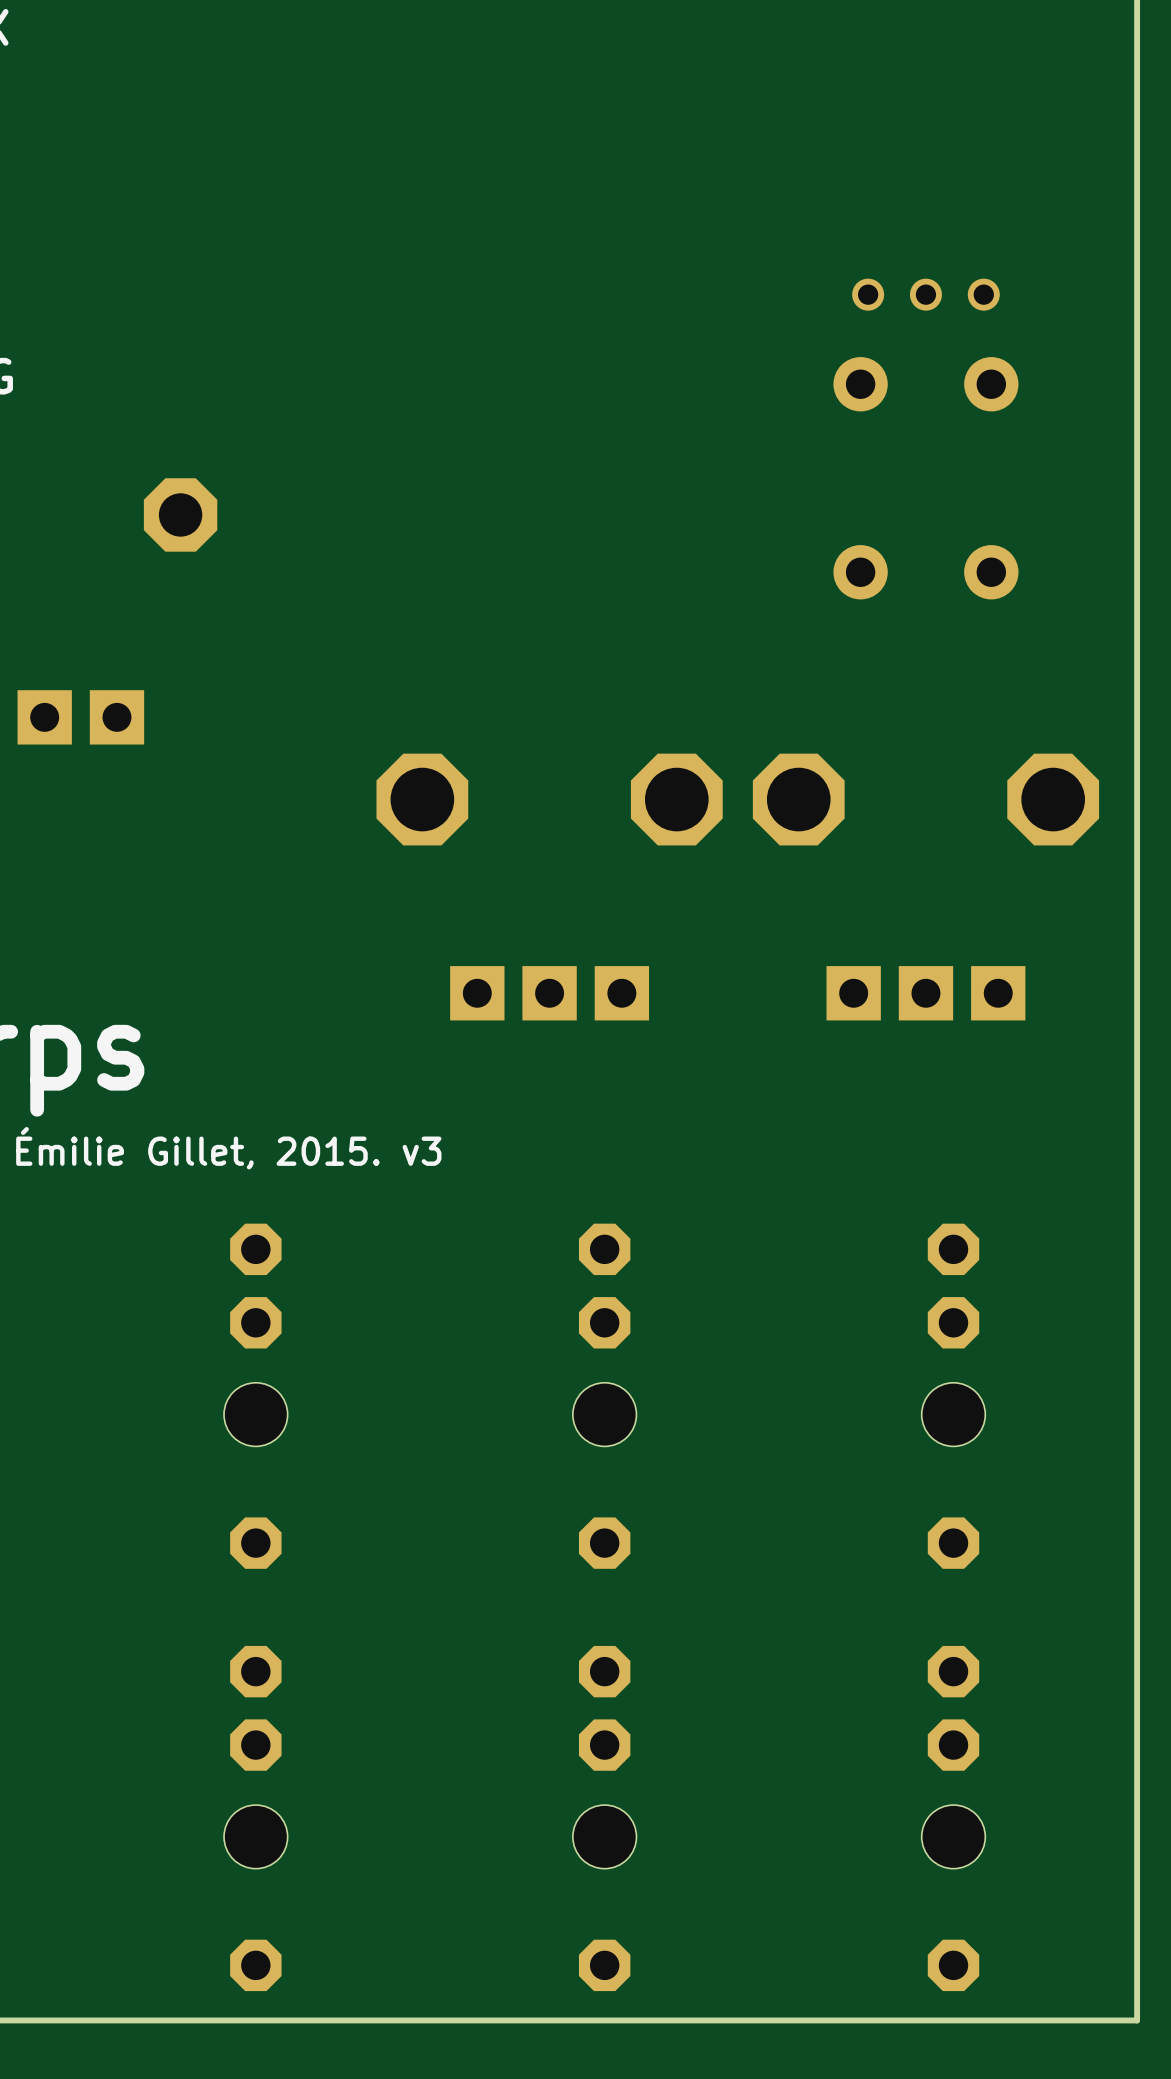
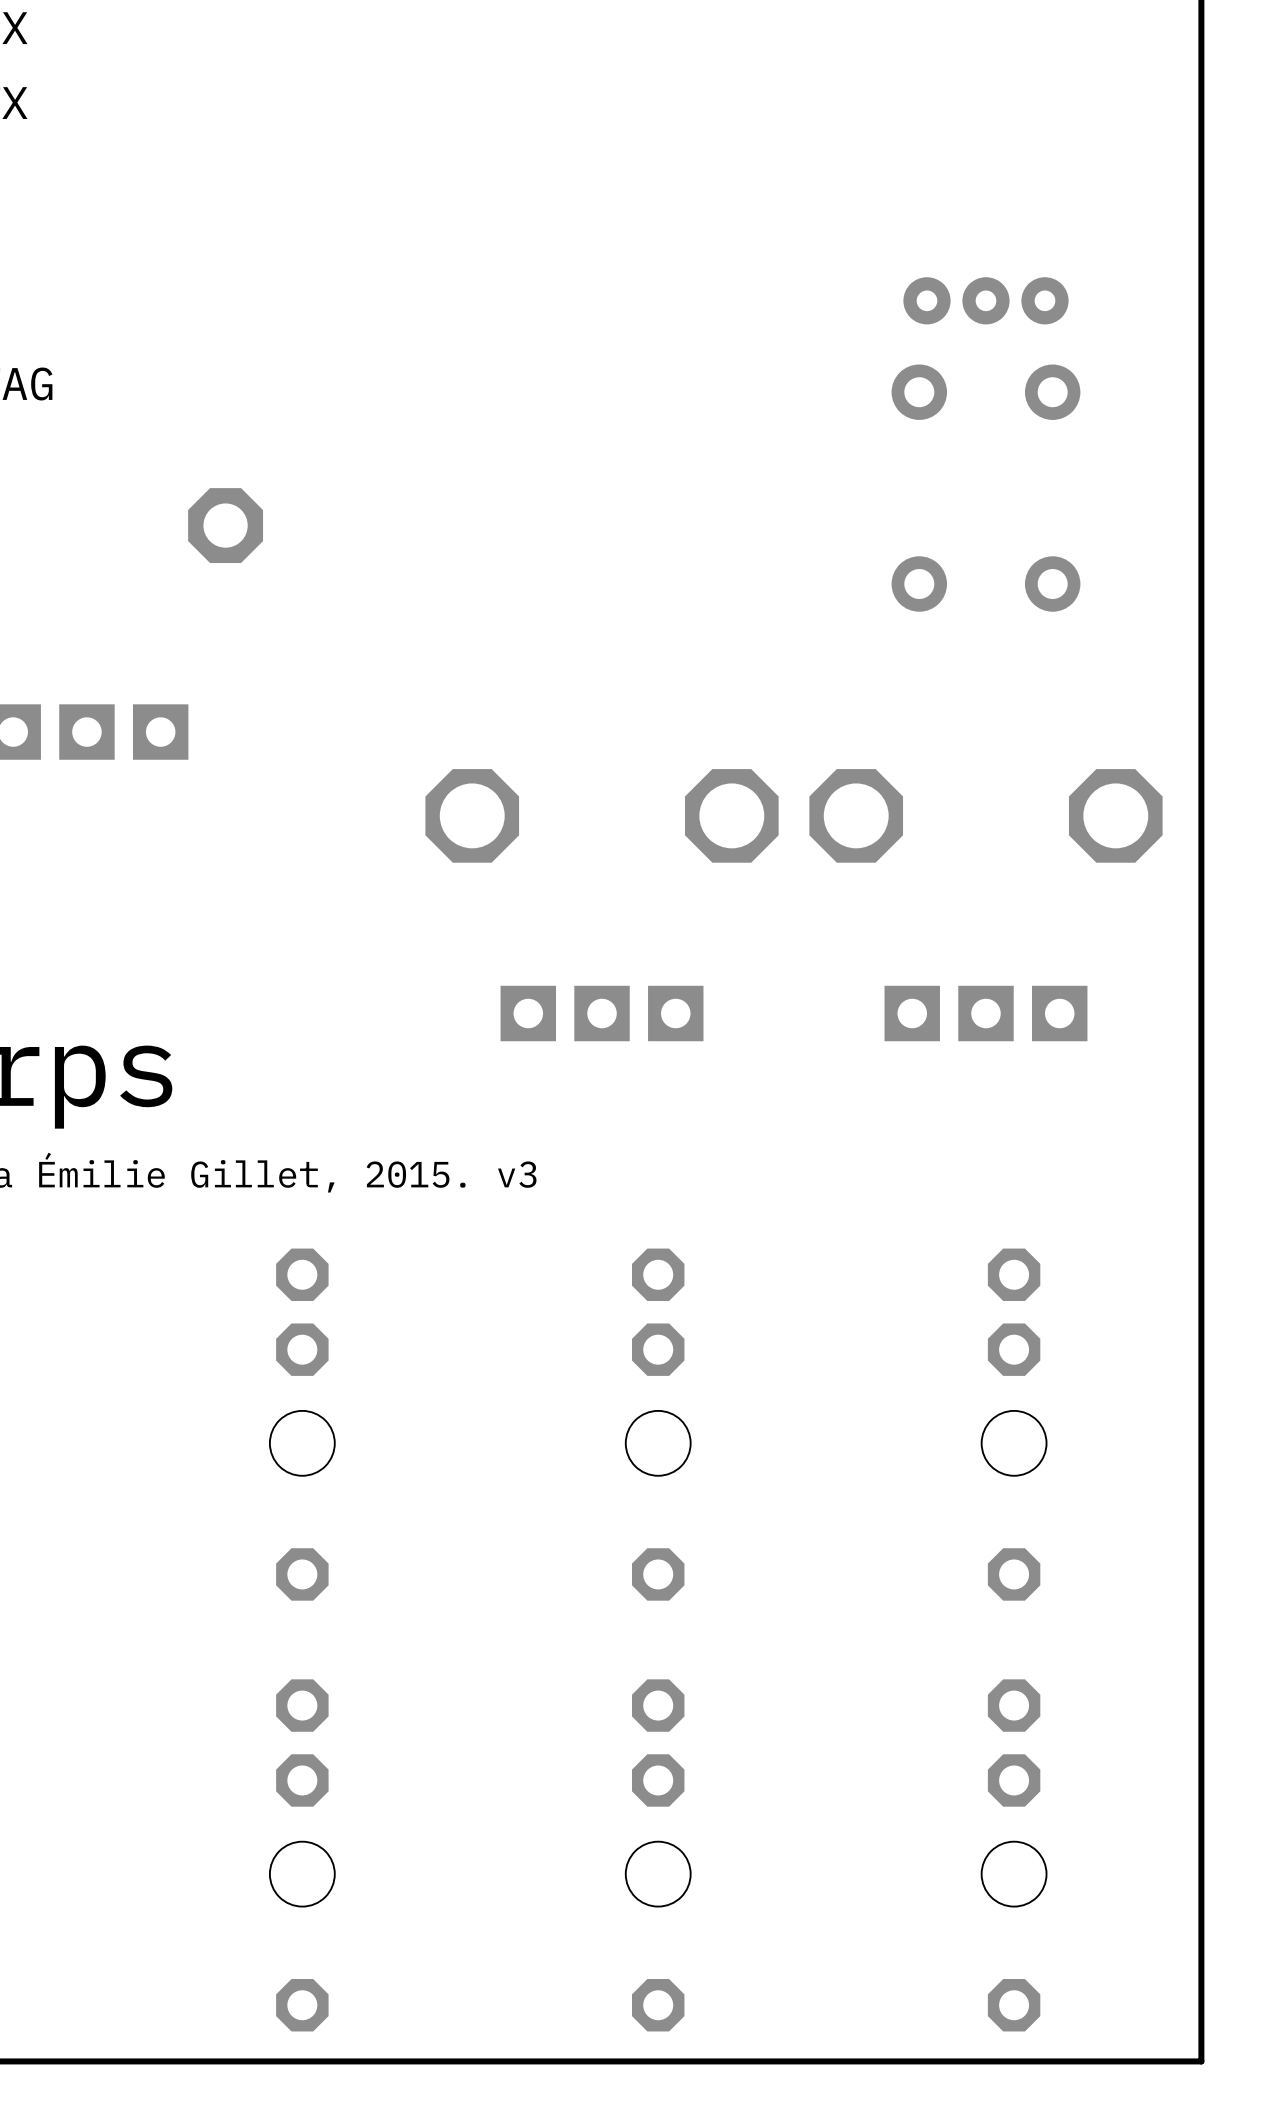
part footprint: [852, 278, 1000, 311] -> [903, 277, 1069, 325]

